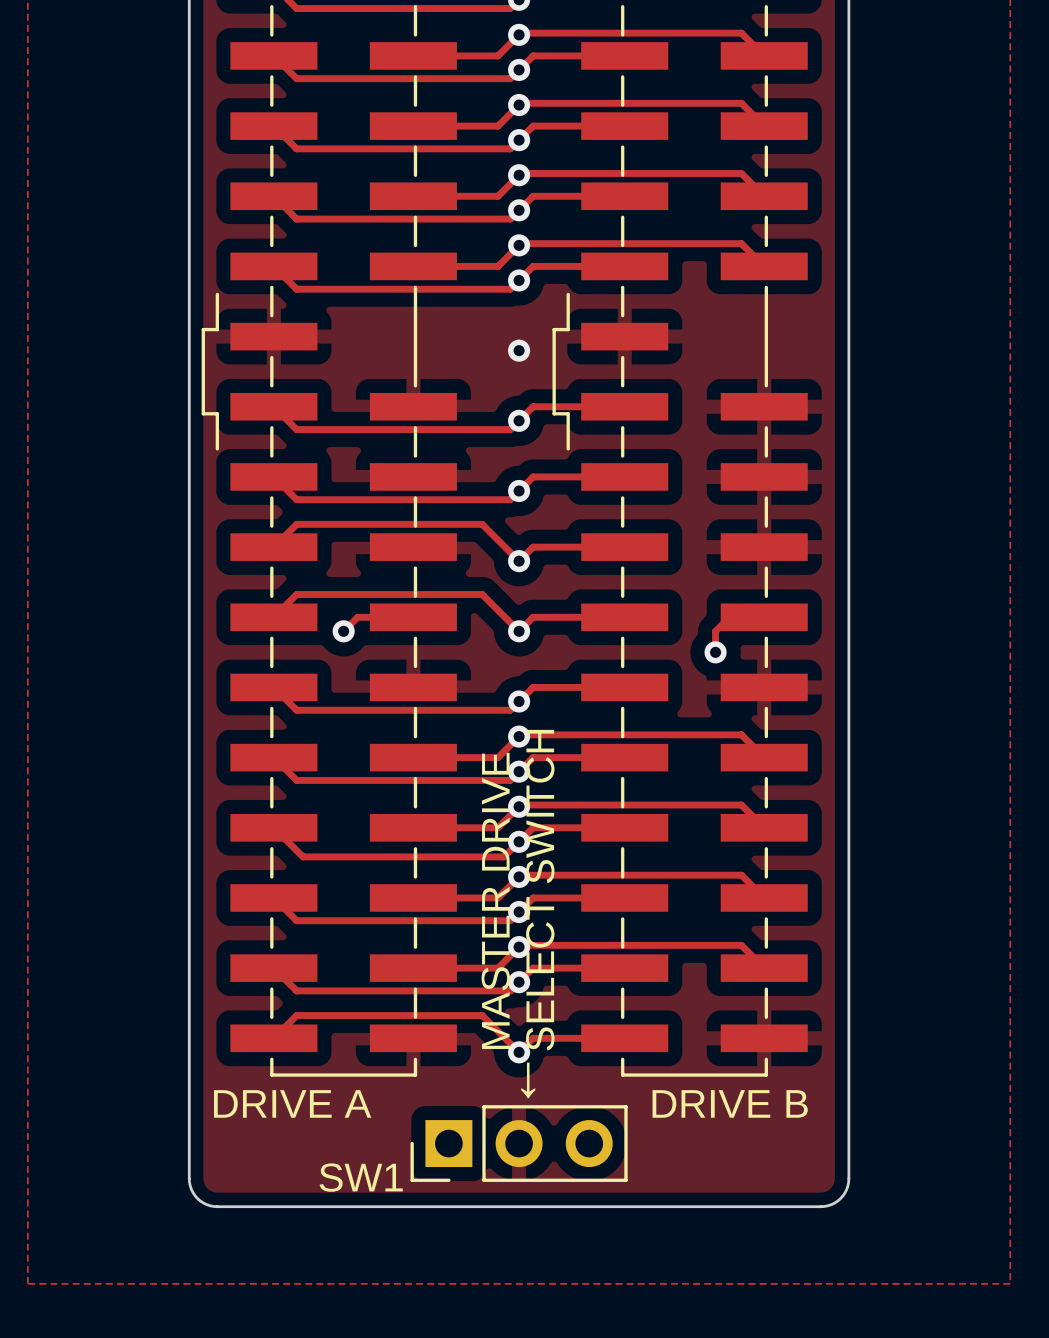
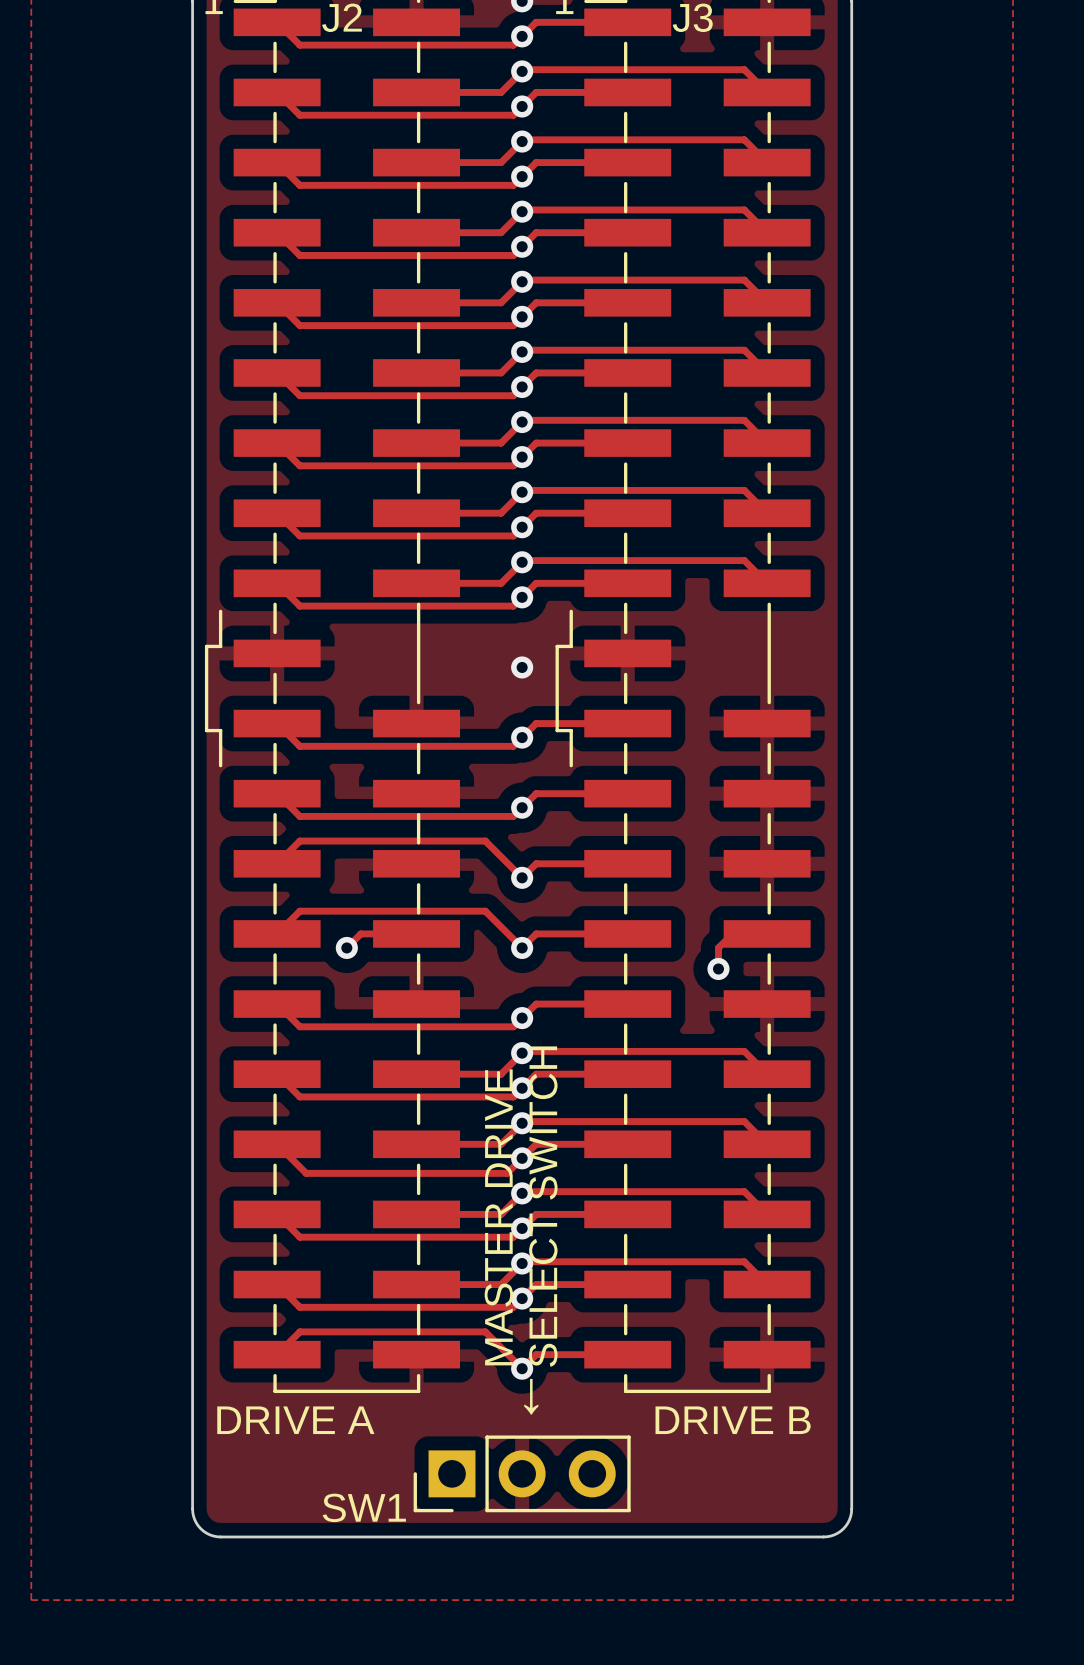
SW1 position: (519, 1143) -> (522, 1473)
board edge: (189, 1178) (191, 1189) (197, 1198) (206, 1204) (217, 1206) (820, 1206) (831, 1204) (840, 1198) (846, 1189) (848, 1178) -> (192, 1494) (192, 1512) (196, 1522) (206, 1533) (220, 1536) (827, 1536) (837, 1533) (847, 1522) (851, 1512) (851, 1494)

